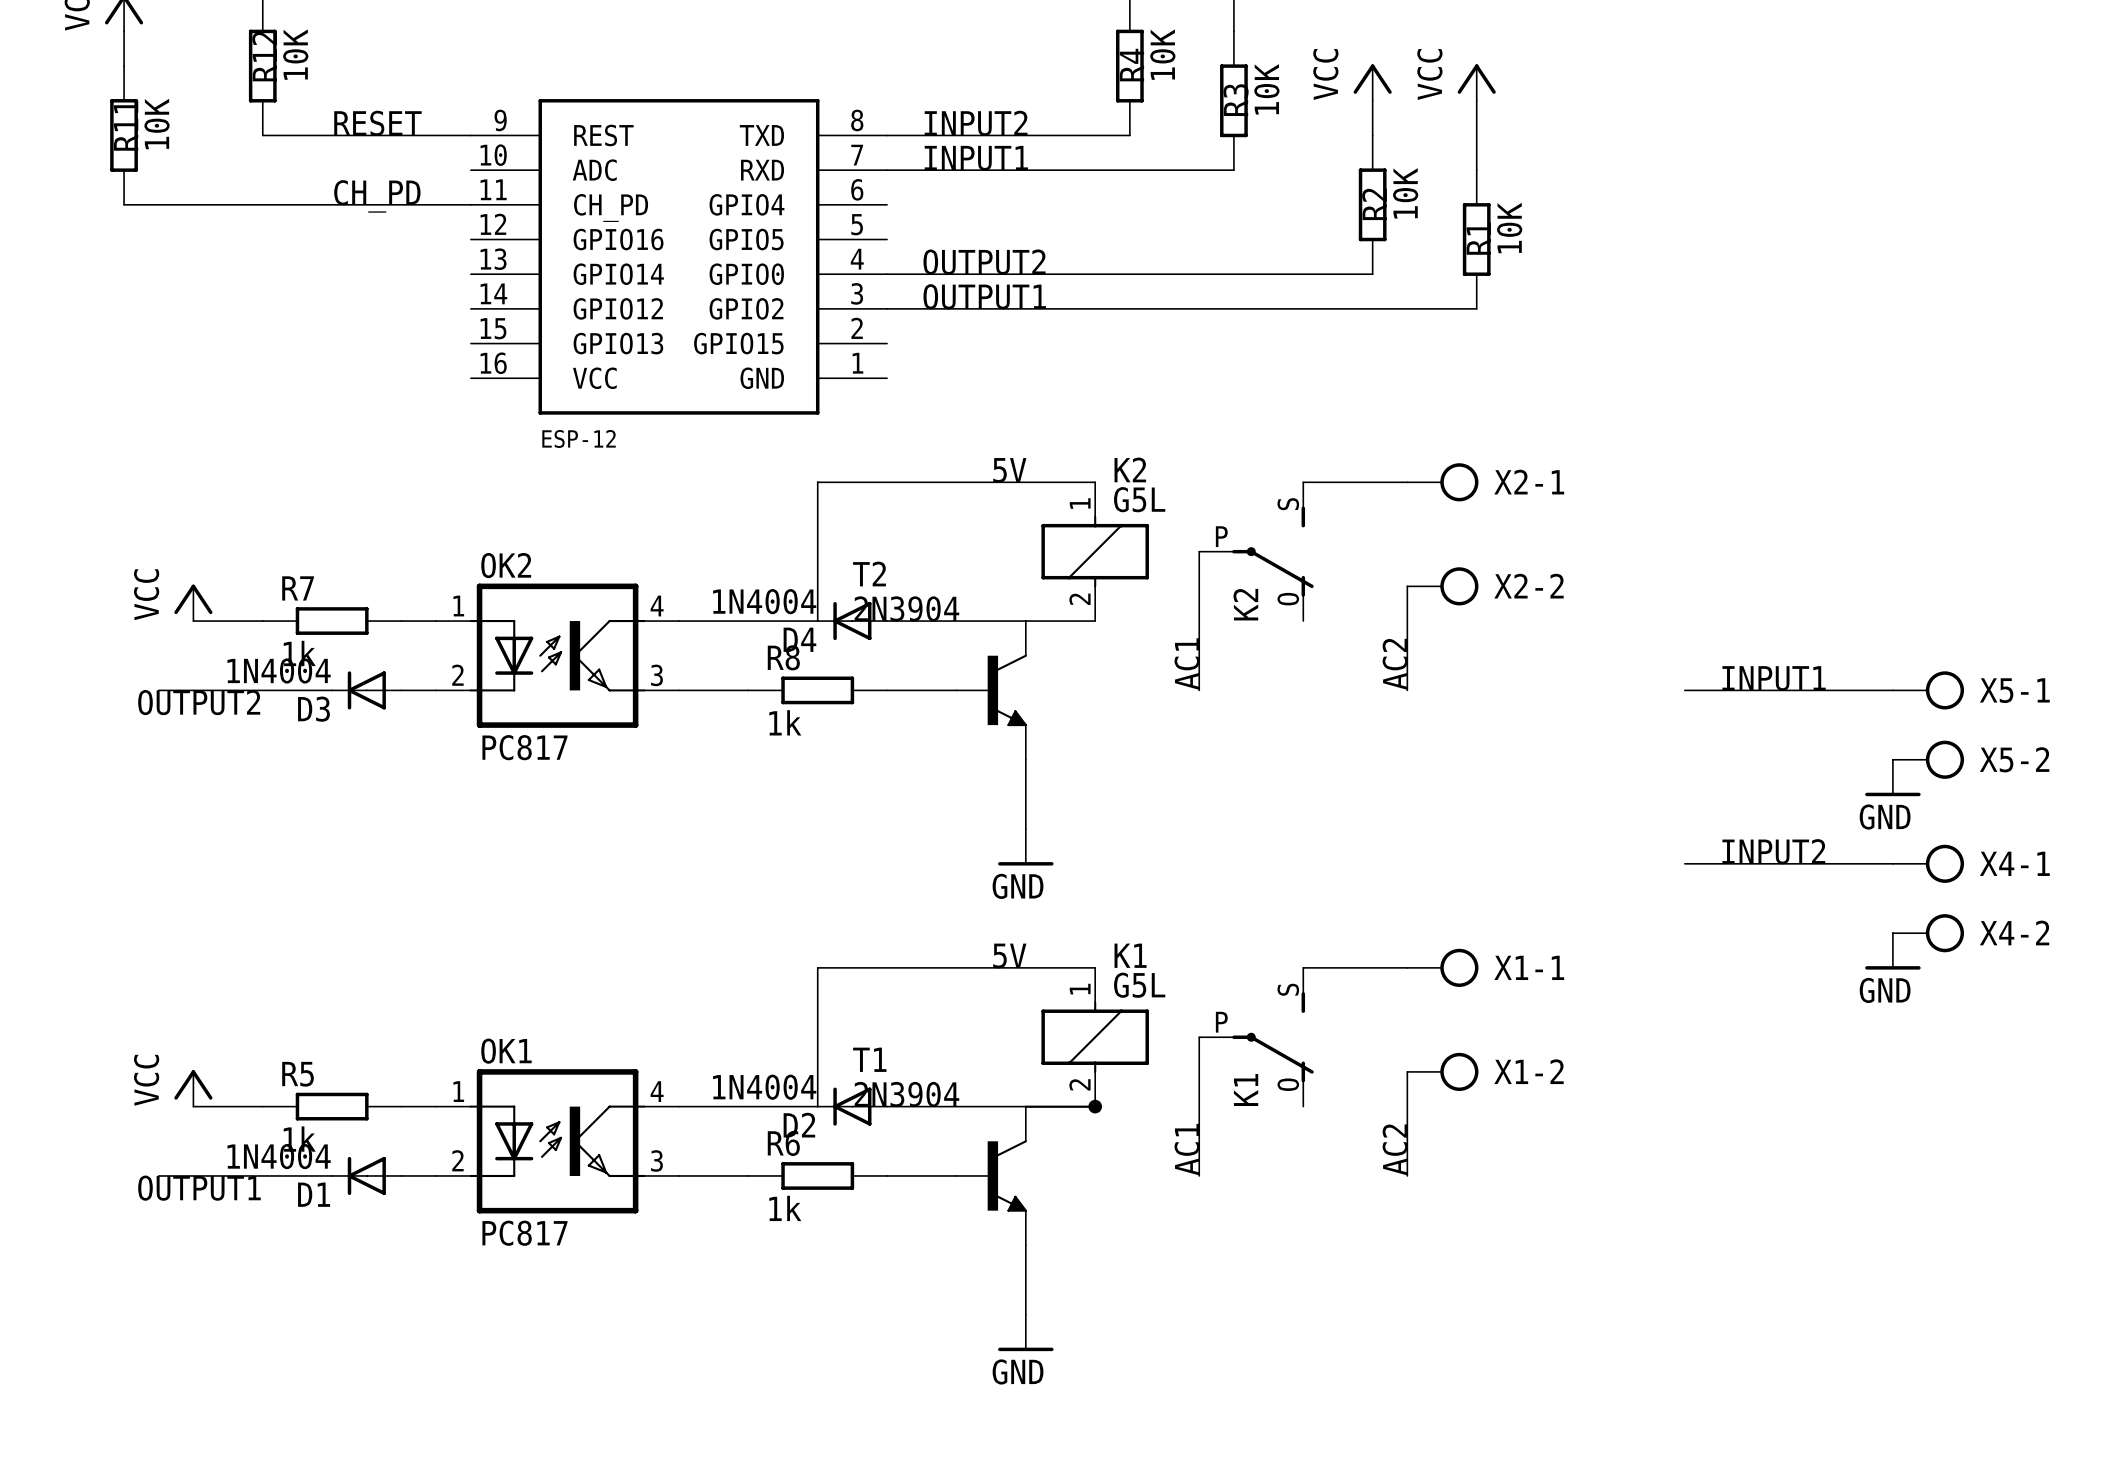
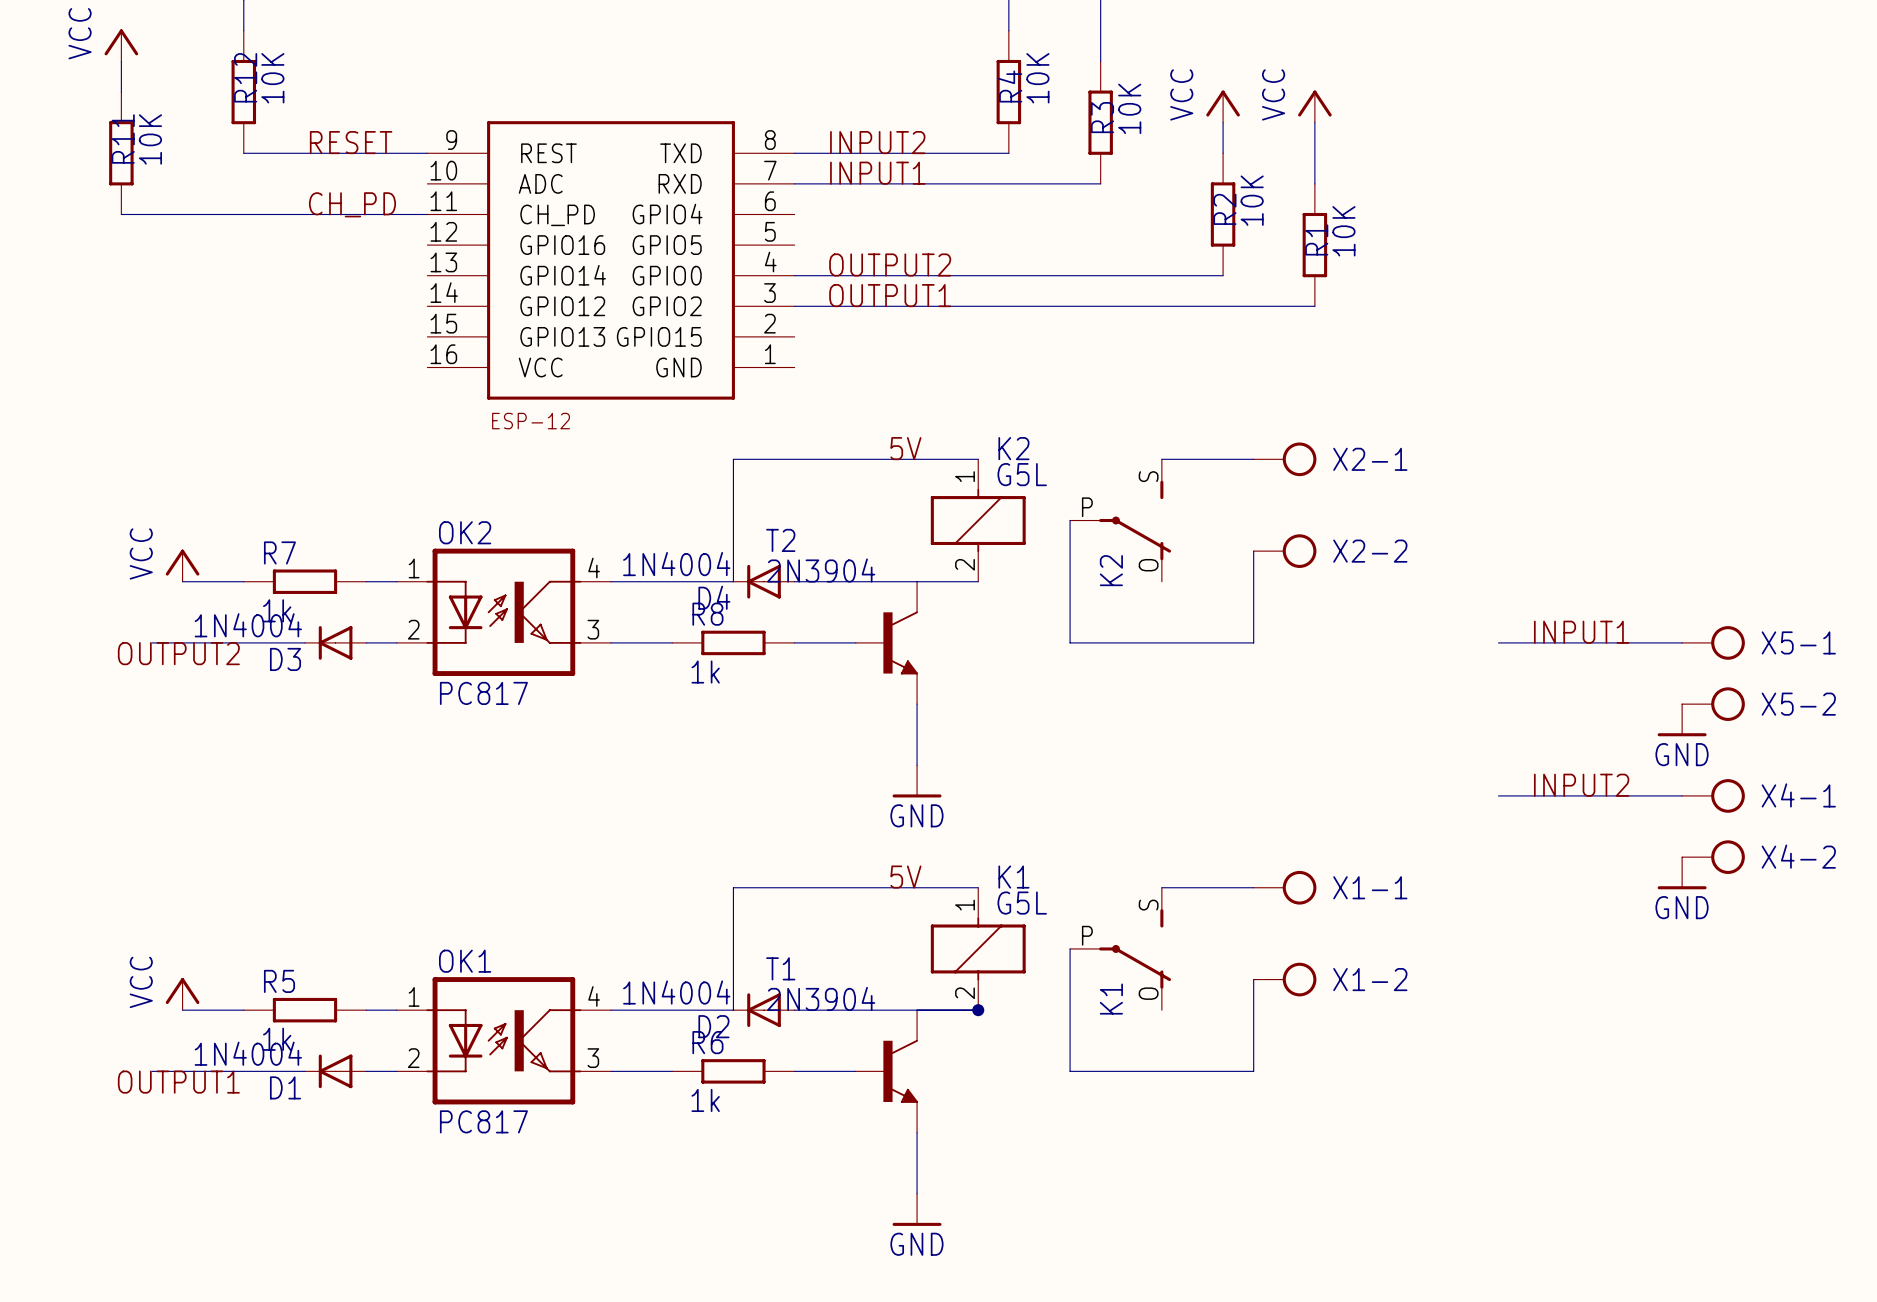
label: AC1 (1187, 664) -> none
label: AC2 (1395, 664) -> none
wire: none -> (1070, 642) (1253, 642)
label: AC1 (1187, 1149) -> none
label: AC2 (1395, 1149) -> none
wire: none -> (1070, 1071) (1253, 1071)

